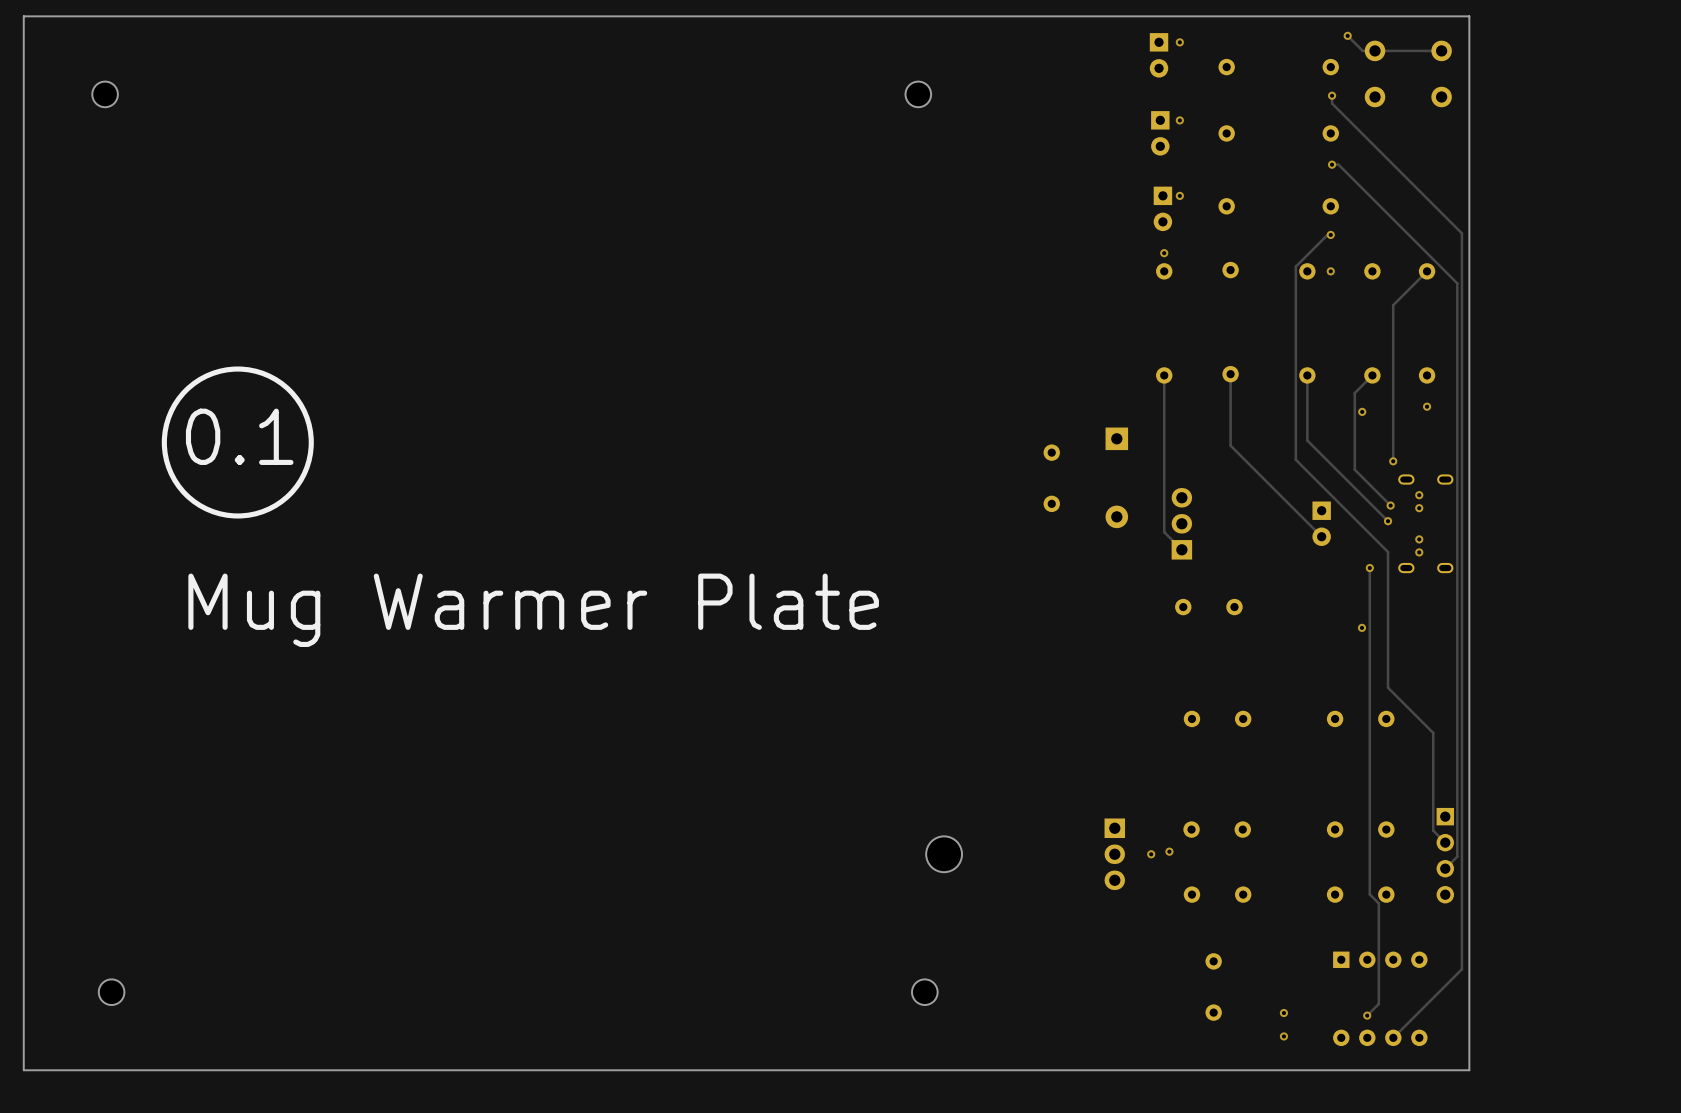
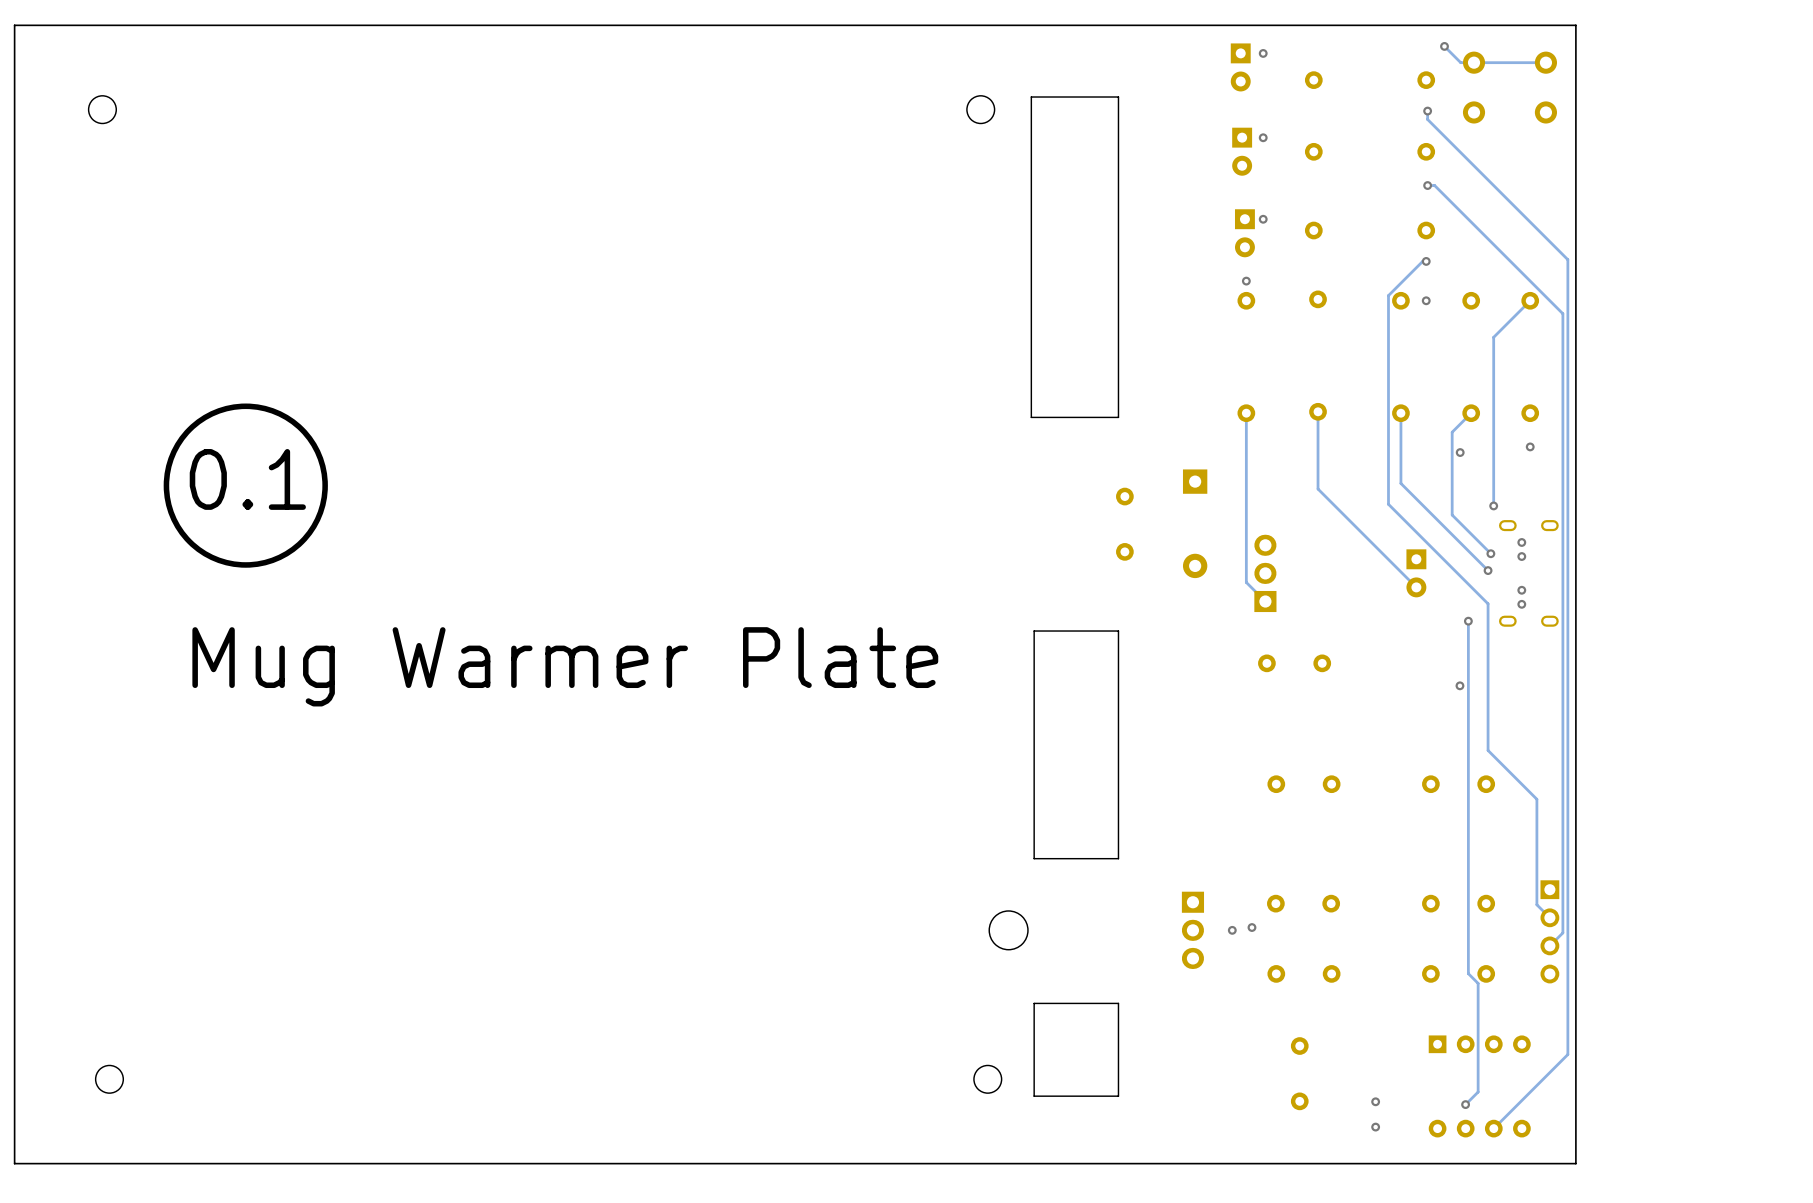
board edge: none -> (1118, 97) (1031, 97) (1031, 417) (1118, 417) (1118, 97)
board edge: none -> (1118, 631) (1118, 858) (1034, 858) (1034, 631) (1118, 631)
board edge: none -> (1118, 1003) (1118, 1096) (1034, 1096) (1034, 1003) (1118, 1003)

